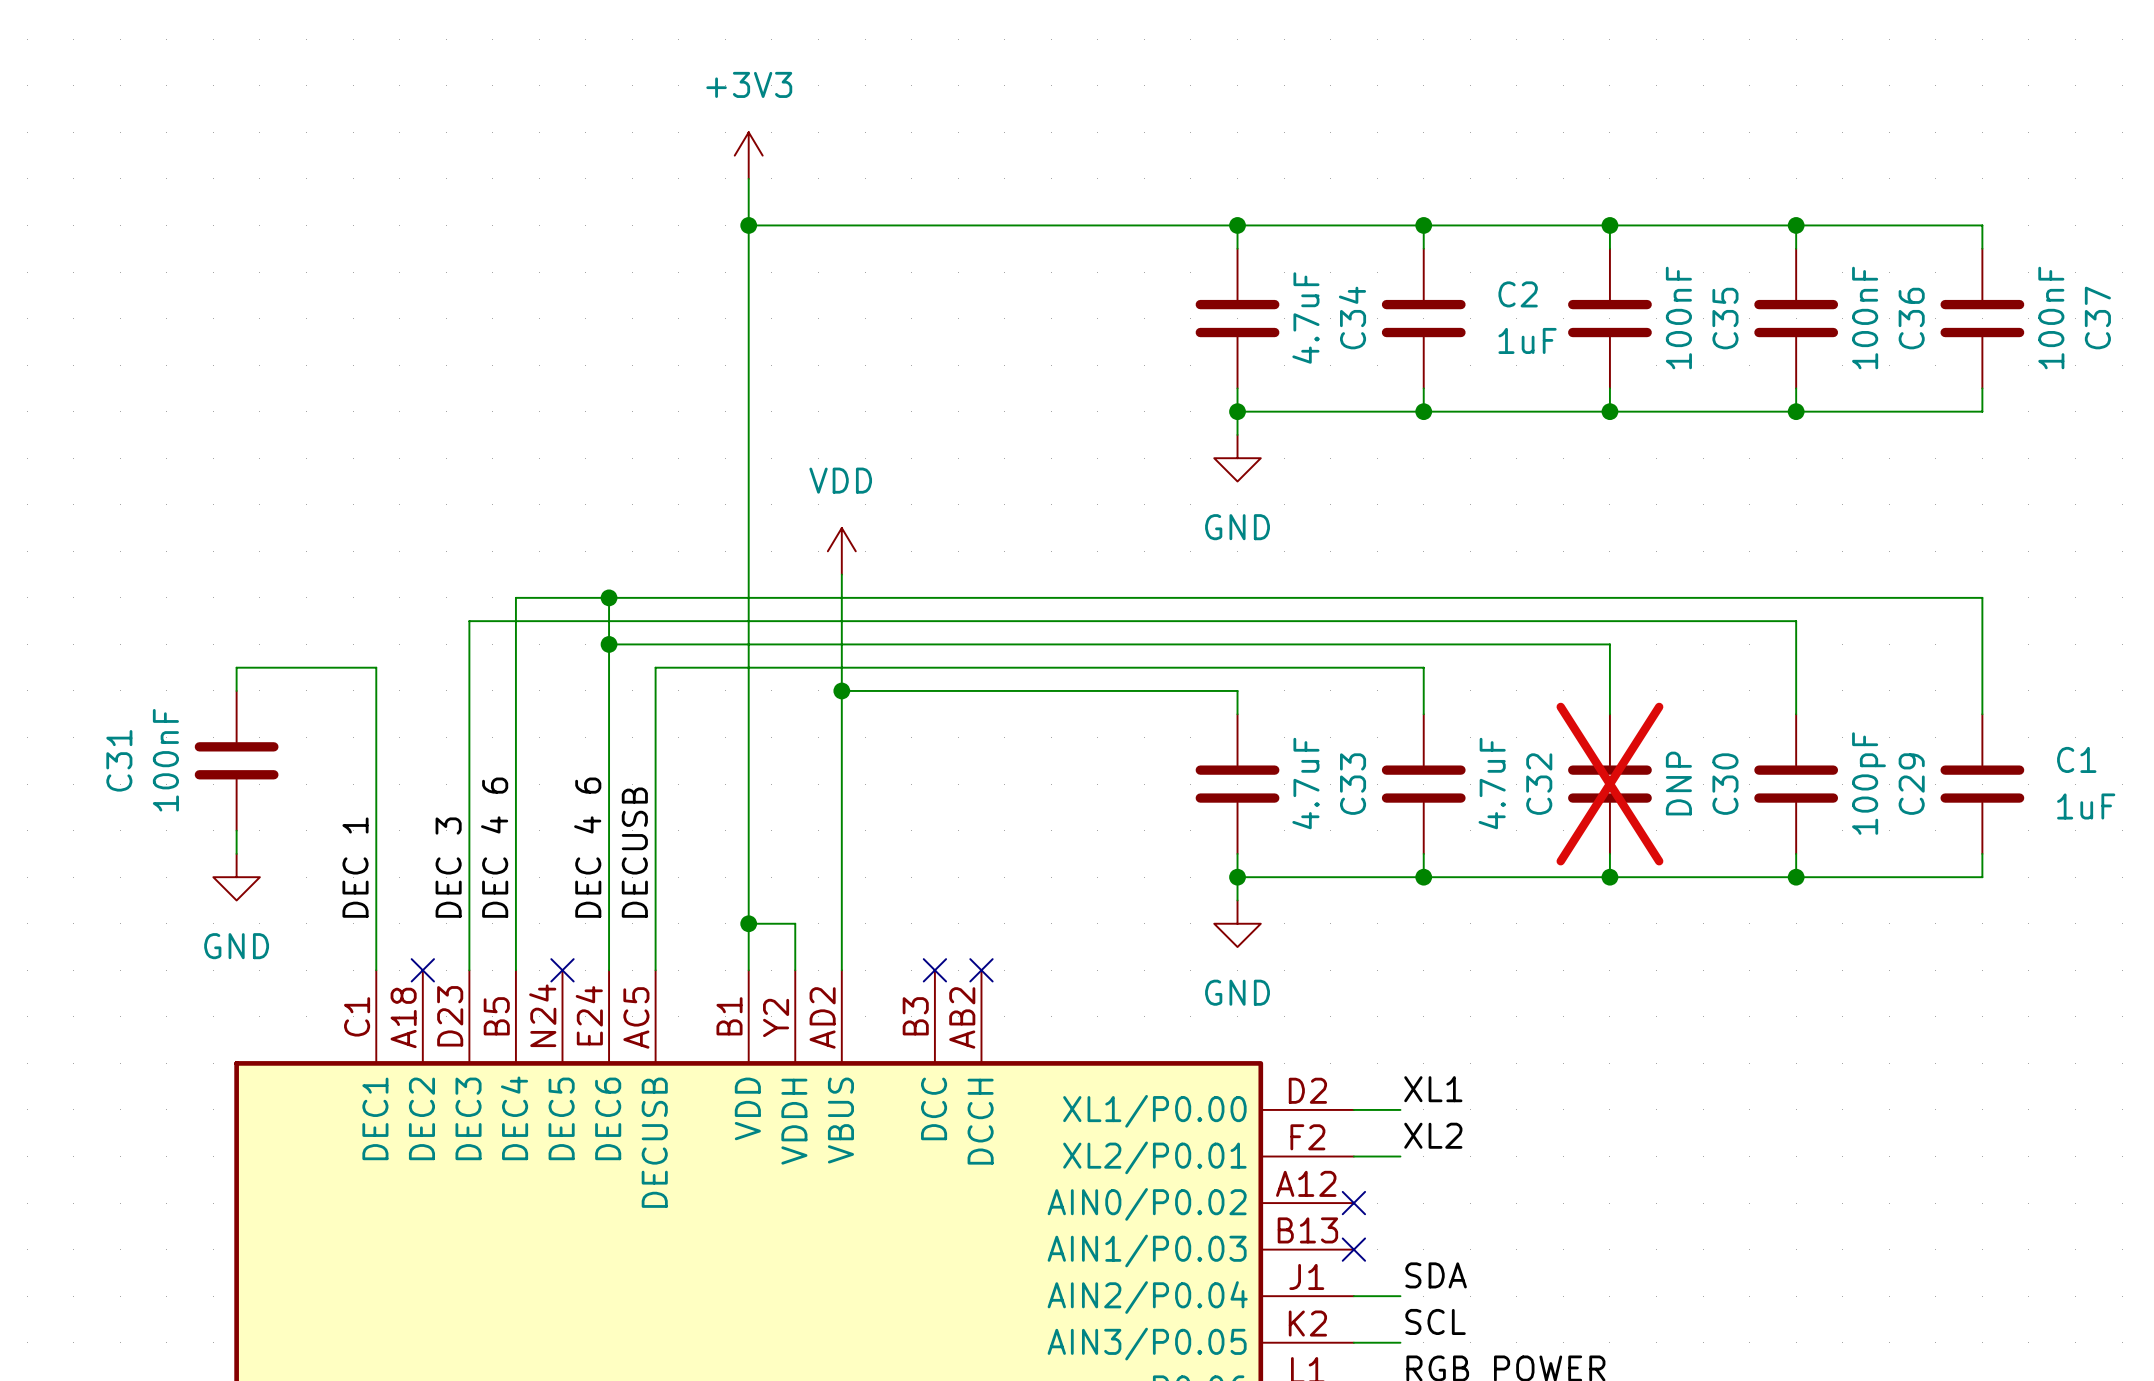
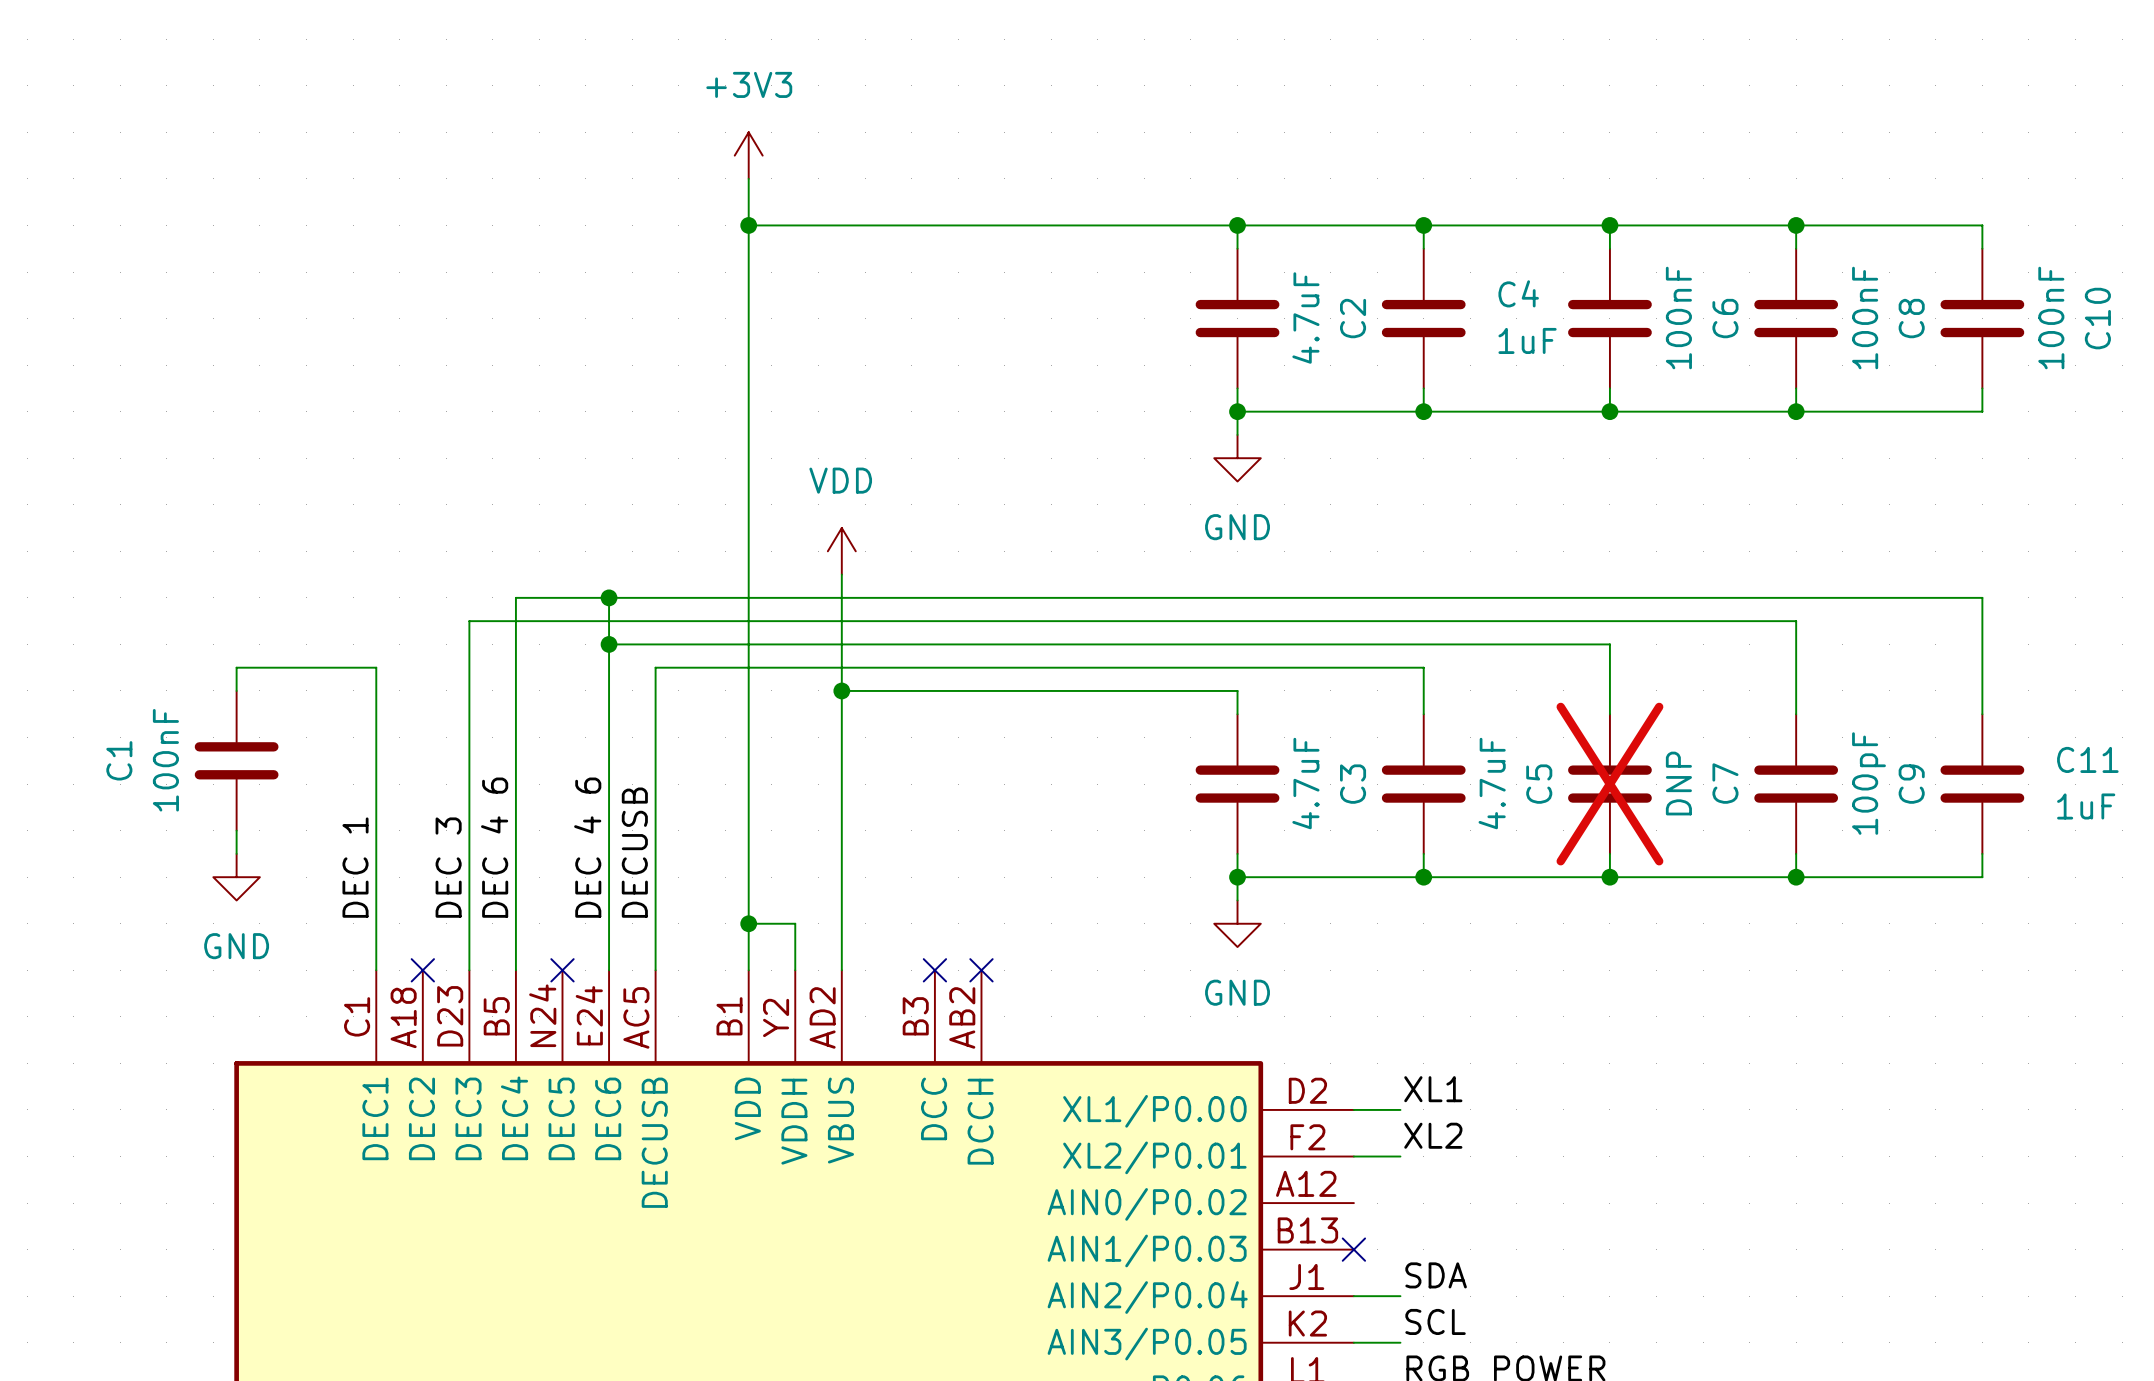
C2 name: C2 (1518, 294) -> C4 (1518, 293)
C34 name: C34 (1352, 318) -> C2 (1353, 318)
C35 name: C35 (1725, 318) -> C6 (1725, 318)
C36 name: C36 (1911, 318) -> C8 (1911, 318)
C37 name: C37 (2097, 318) -> C10 (2097, 318)
C1 name: C1 (2076, 759) -> C11 (2087, 759)
C31 name: C31 (119, 760) -> C1 (119, 760)
C33 name: C33 (1353, 784) -> C3 (1353, 784)
C32 name: C32 (1539, 784) -> C5 (1539, 784)
C30 name: C30 (1725, 784) -> C7 (1725, 783)
C29 name: C29 (1911, 784) -> C9 (1911, 784)
no-connect mark: (1353, 1203) -> none

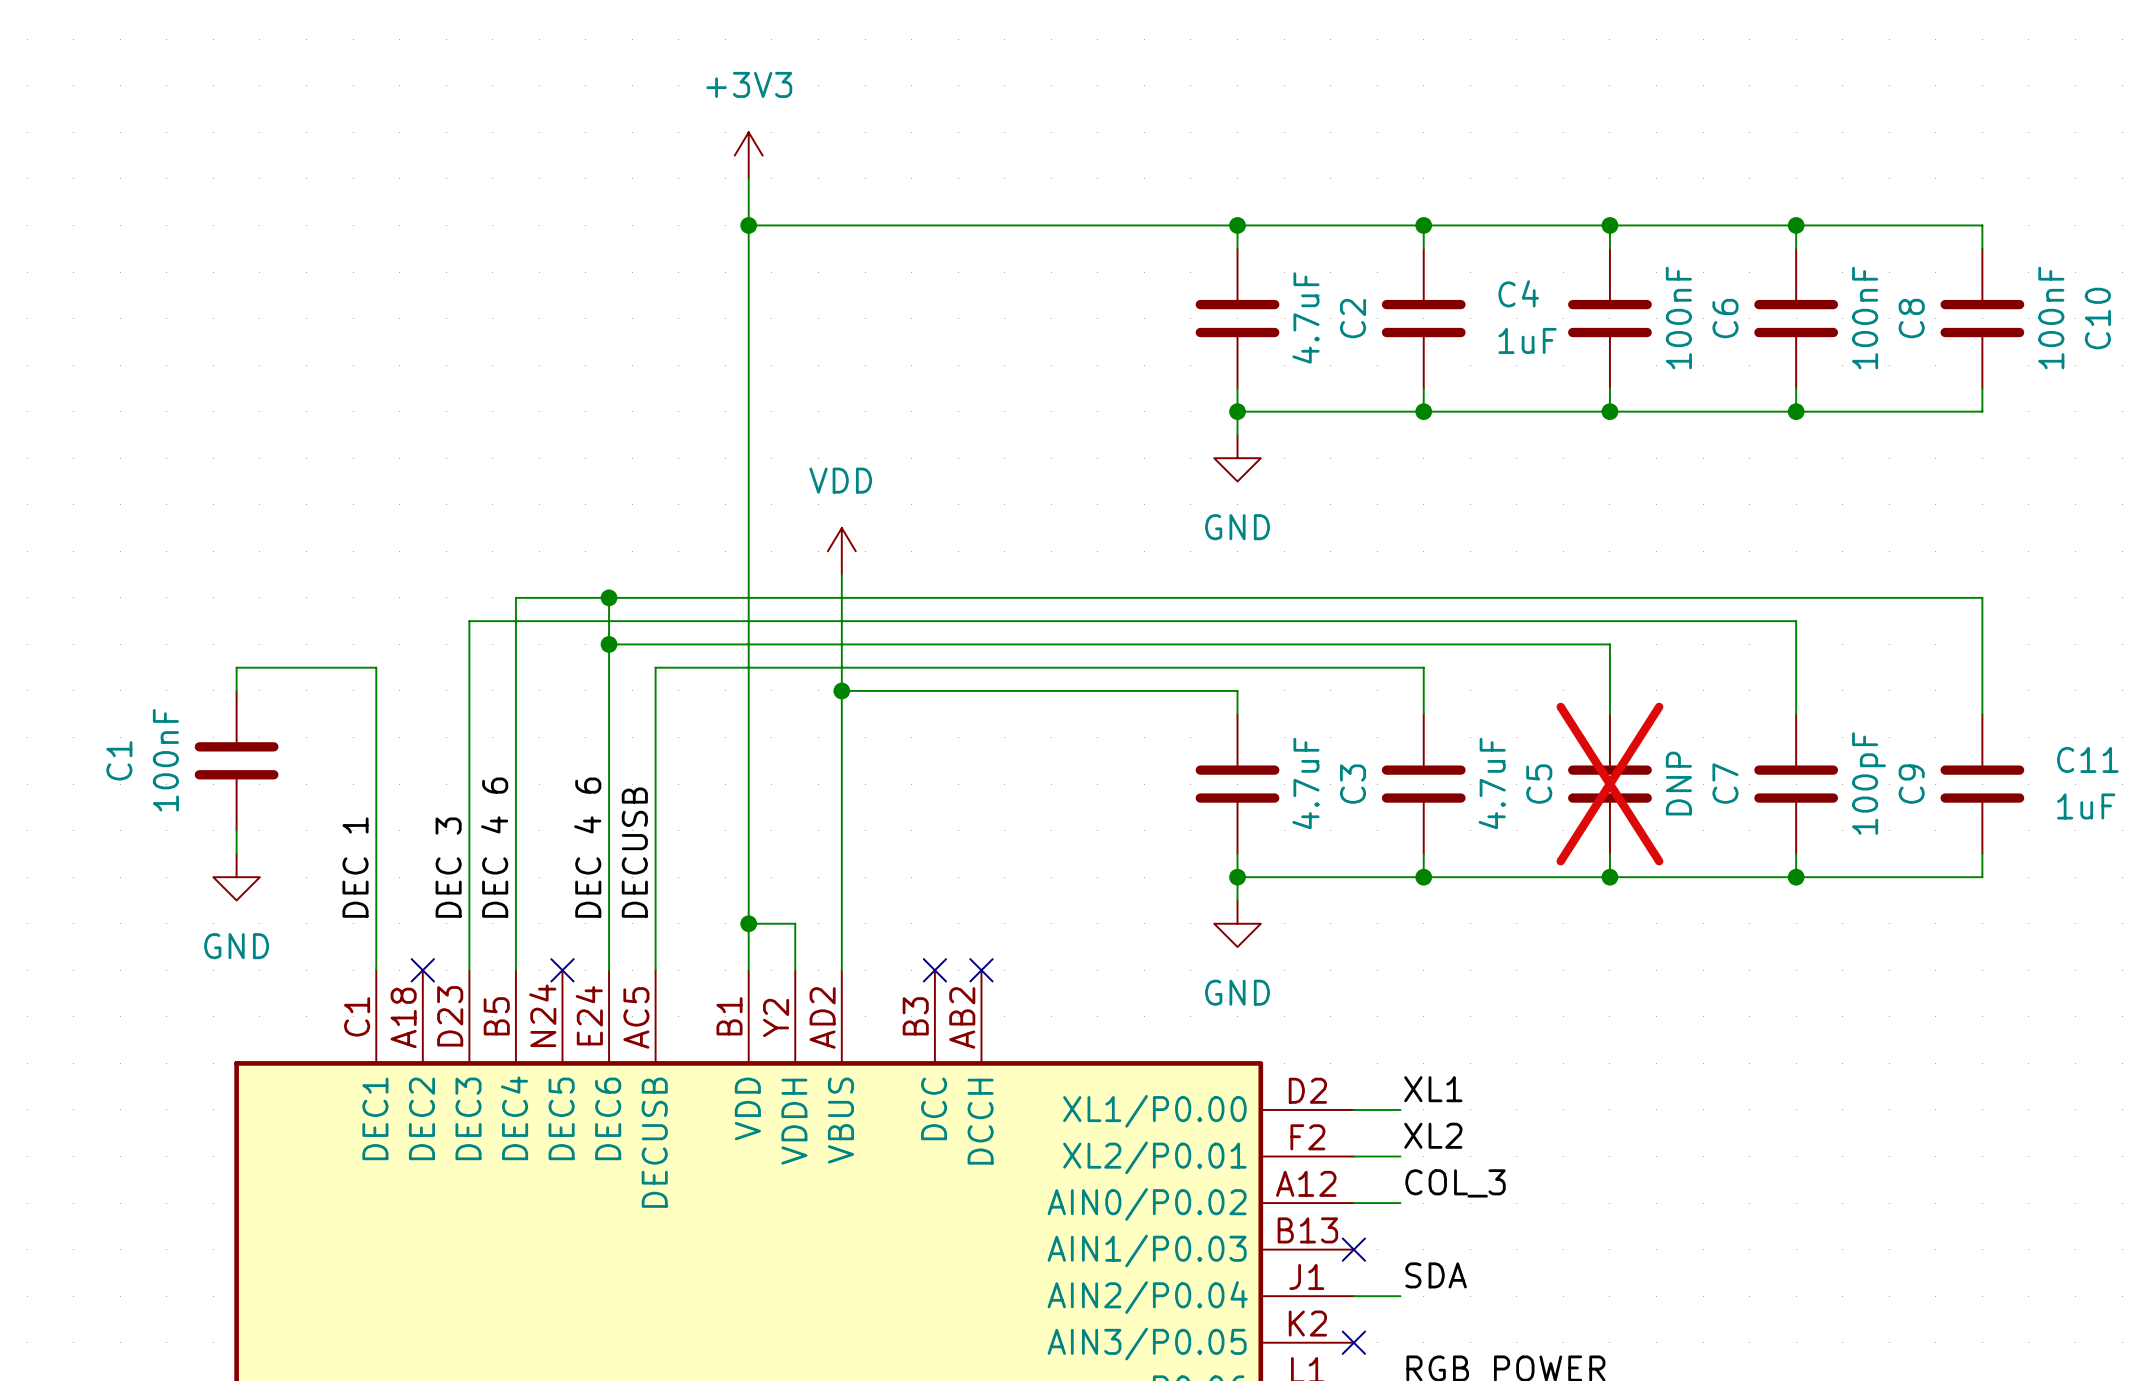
label: none -> COL_3 (1455, 1183)
label: SCL (1435, 1321) -> none
wire: (1353, 1342) (1400, 1342) -> (1353, 1203) (1400, 1203)
no-connect mark: none -> (1353, 1342)

